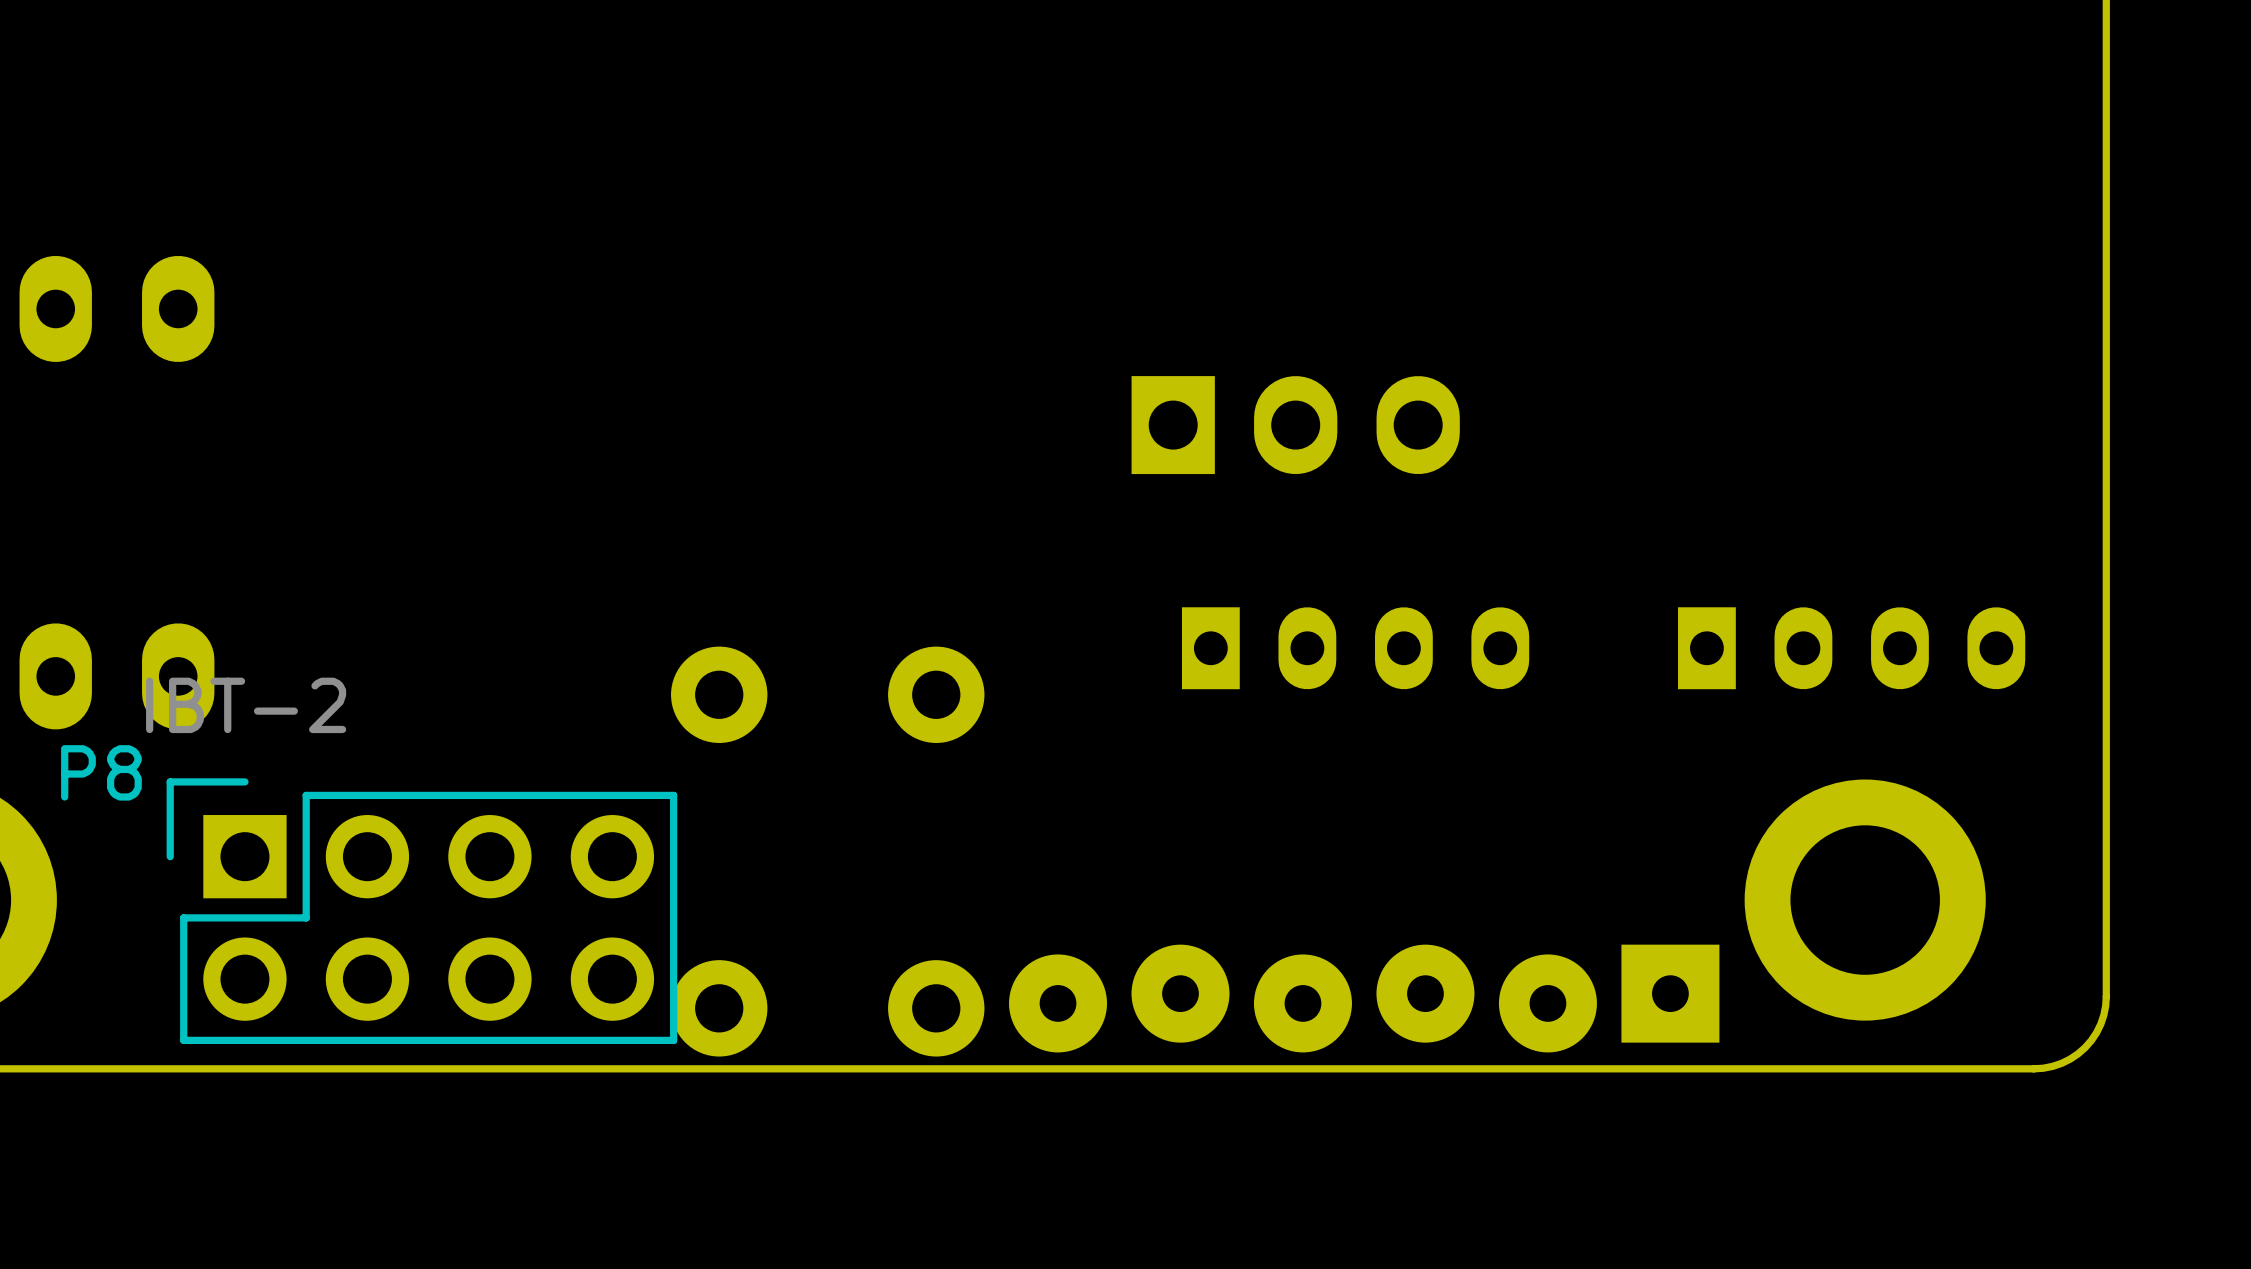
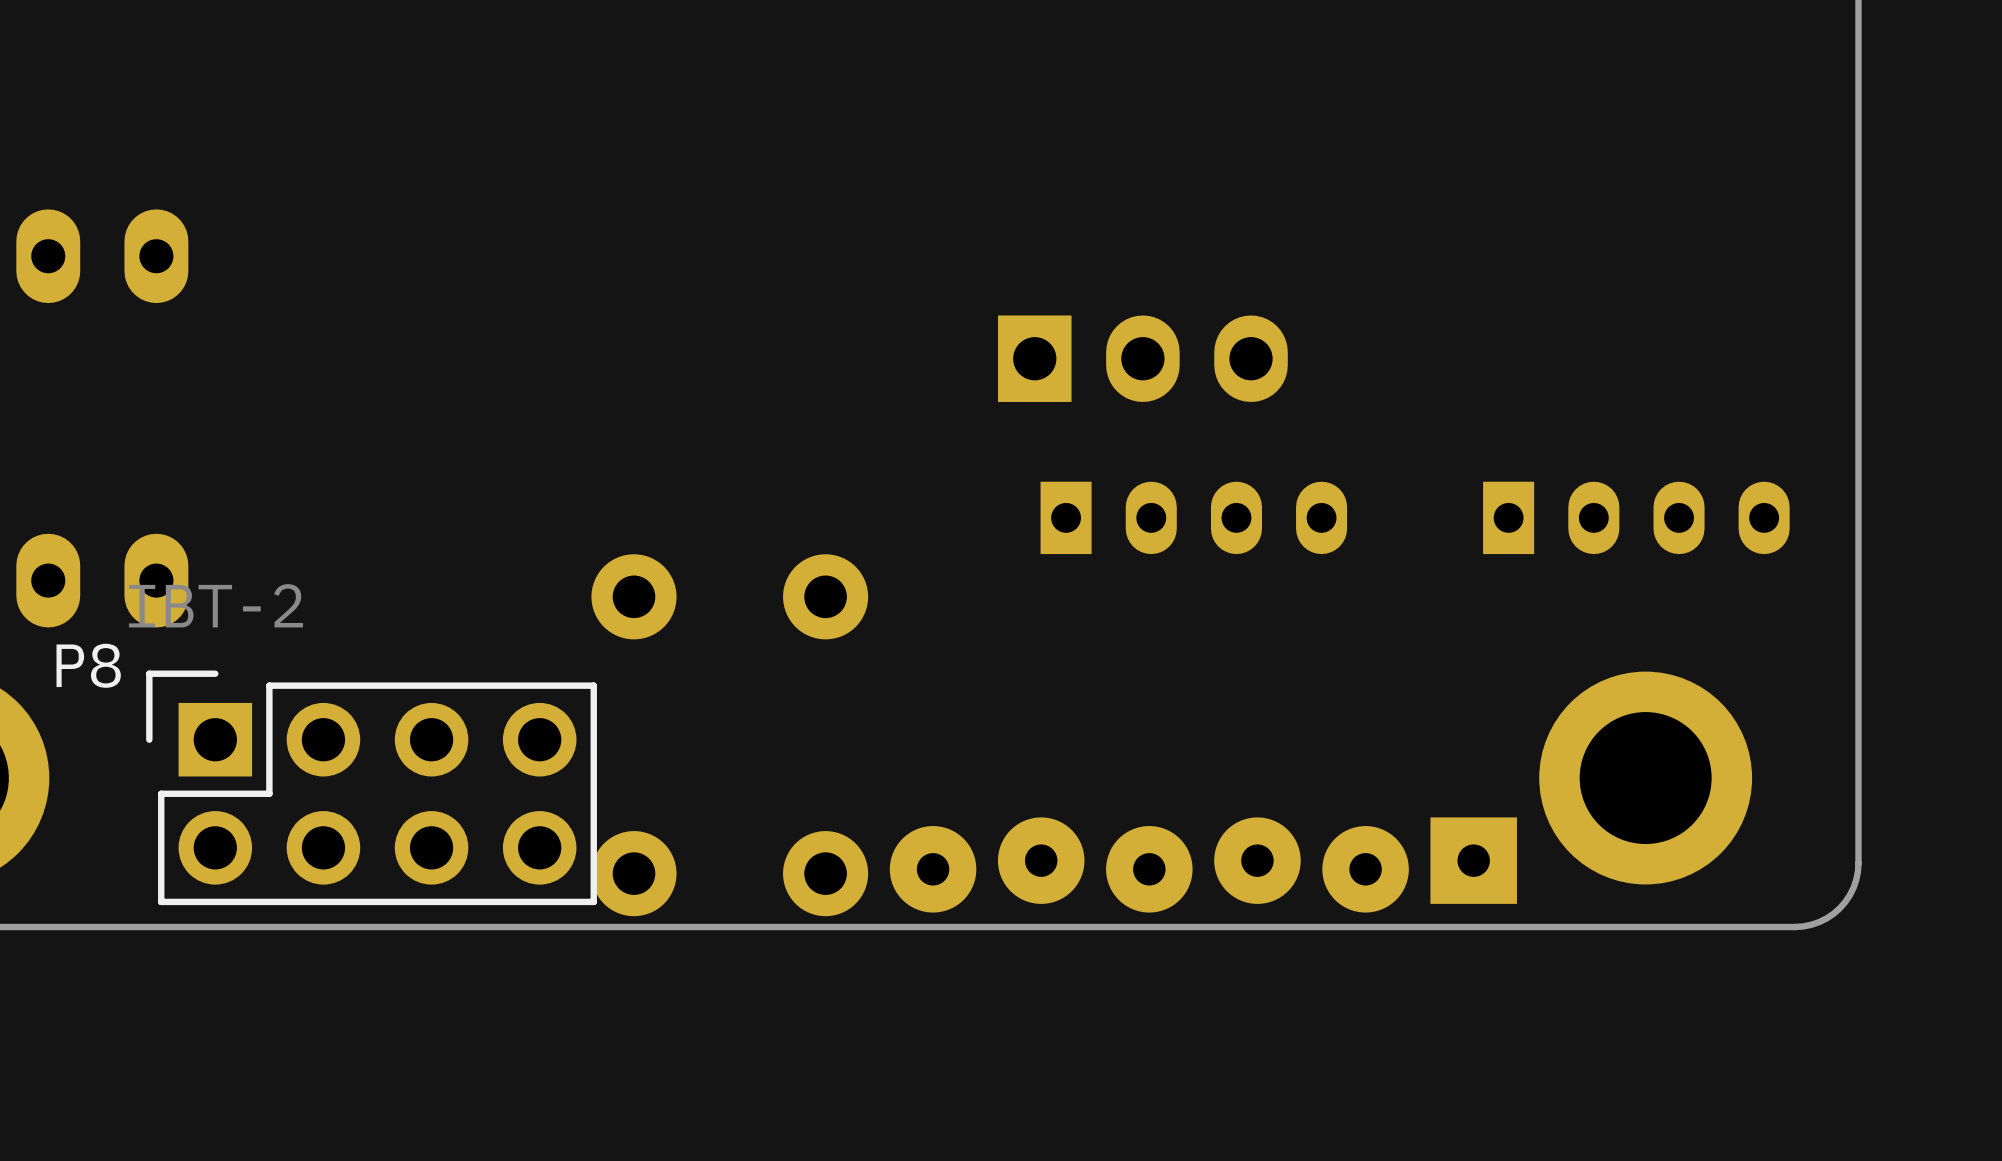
part position: (1355, 648) -> (1193, 517)
part position: (1851, 648) -> (1636, 517)

